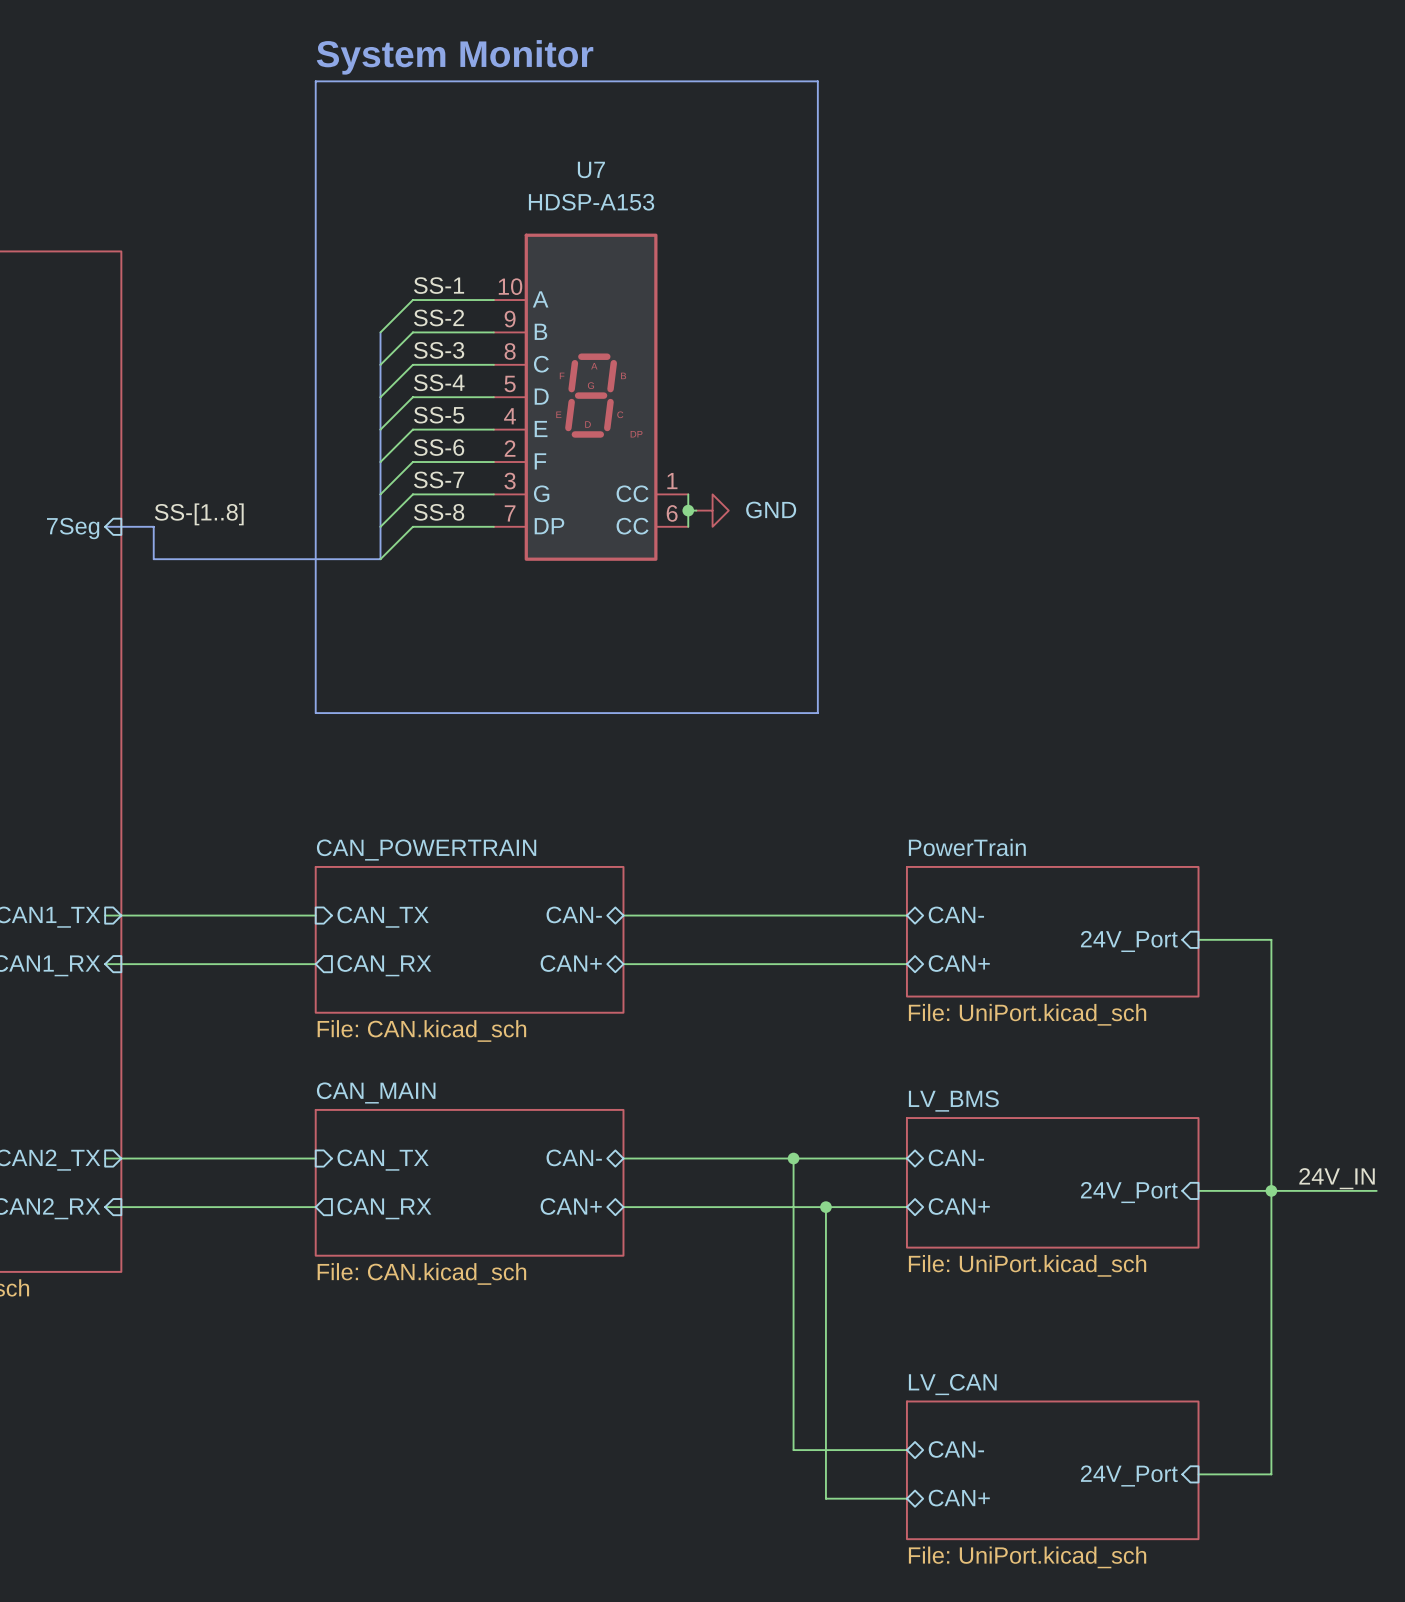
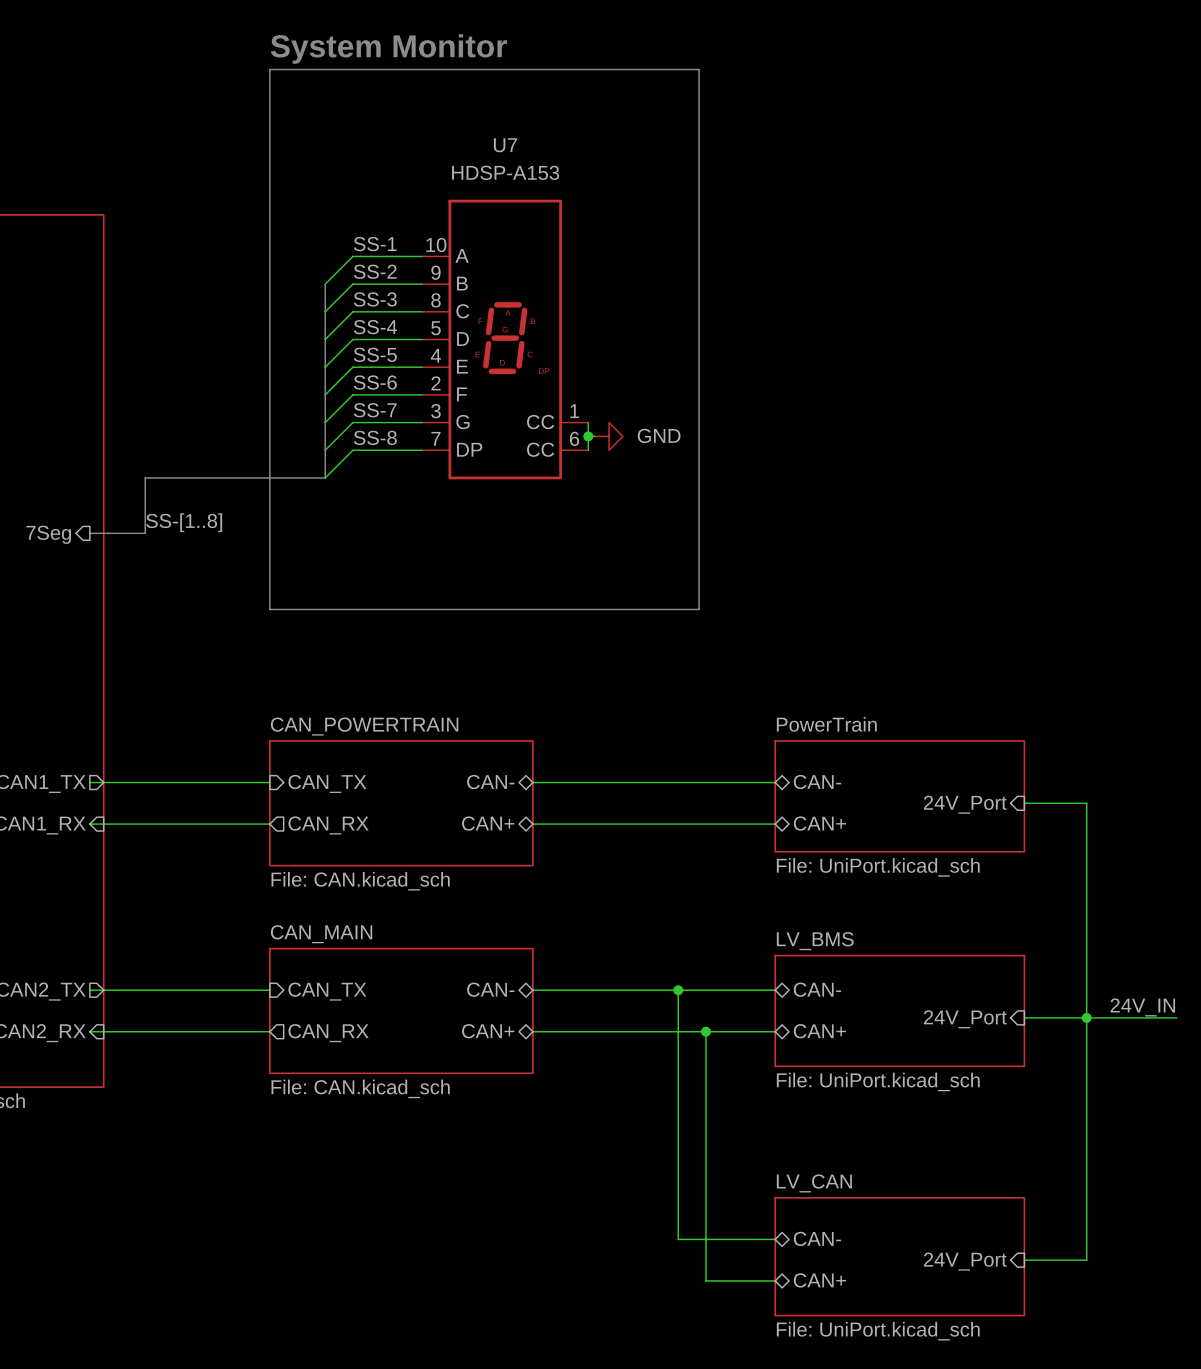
label position: SS-[1..8] (199, 514) -> SS-[1..8] (184, 522)
bus: (105, 526) (153, 526) (153, 559) (169, 559) -> (89, 533) (145, 533) (145, 477)
sheet pin position: 7Seg (73, 528) -> 7Seg (48, 534)

